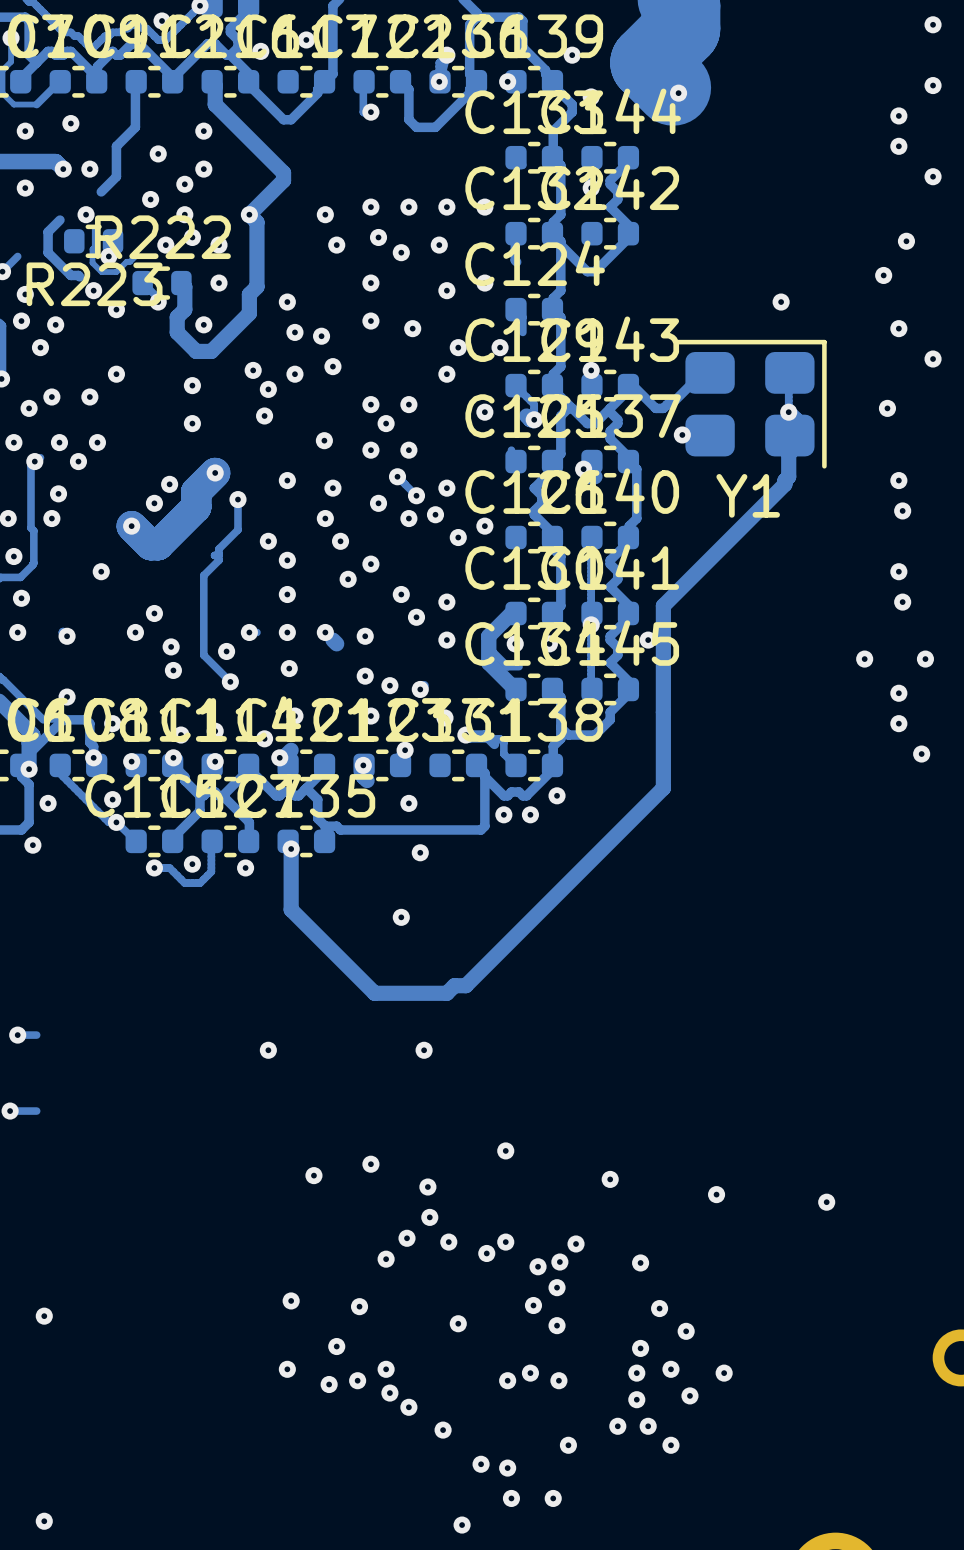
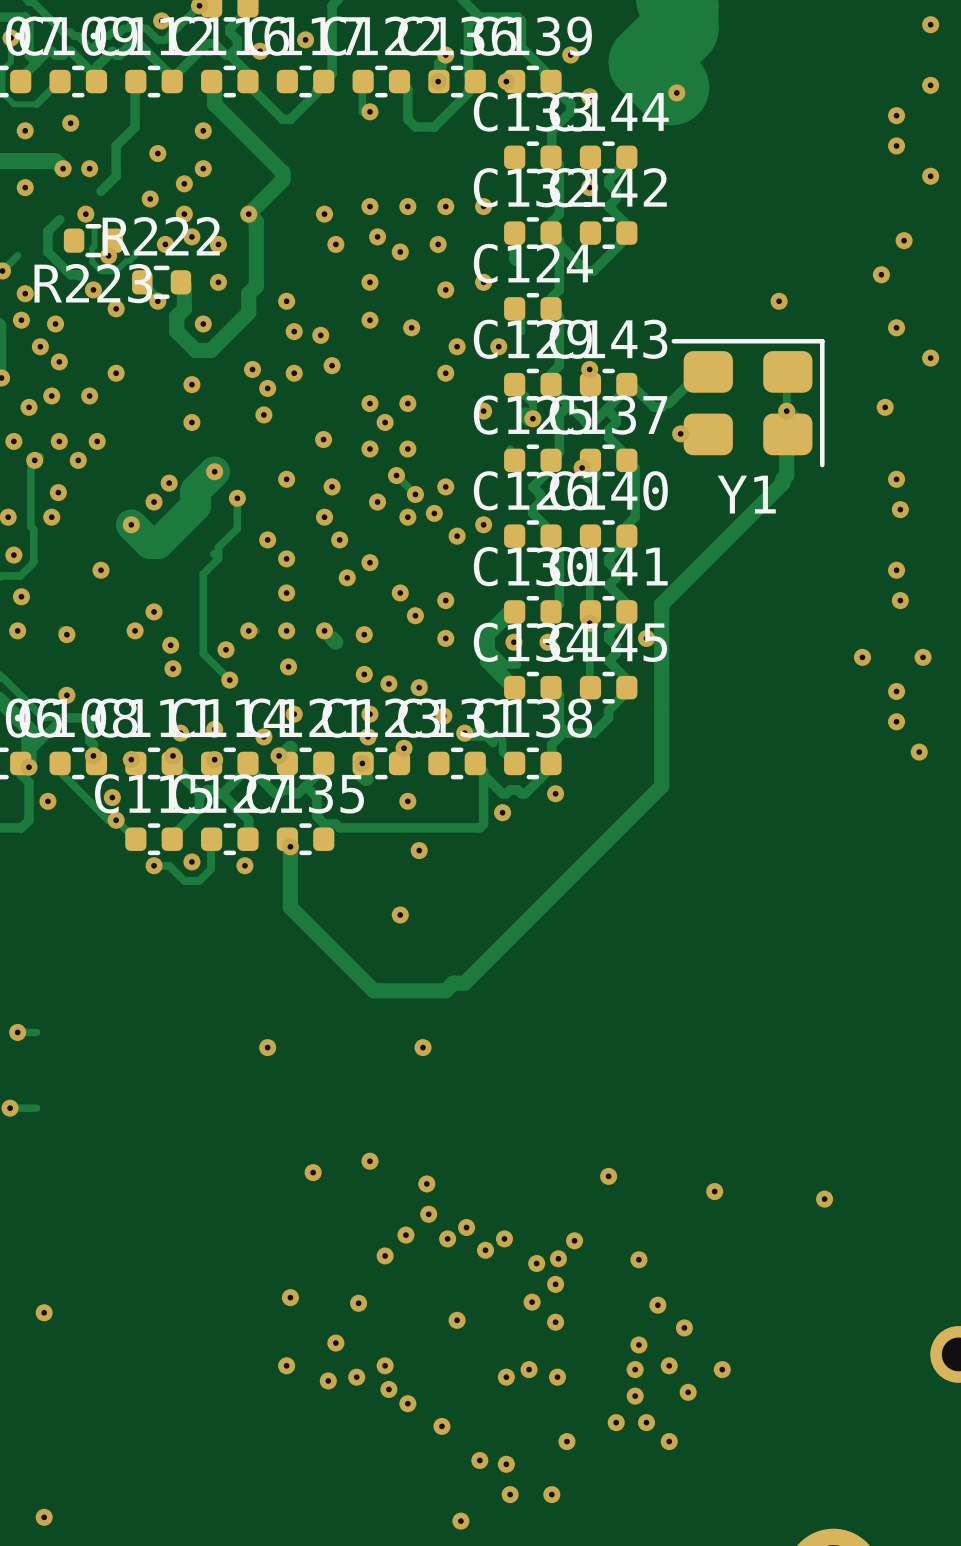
via: none -> (59, 361)
via: (112, 723) -> none
via: none -> (368, 736)
via: (530, 814) -> none
via: (32, 845) -> none
via position: (505, 1150) -> (466, 1227)

